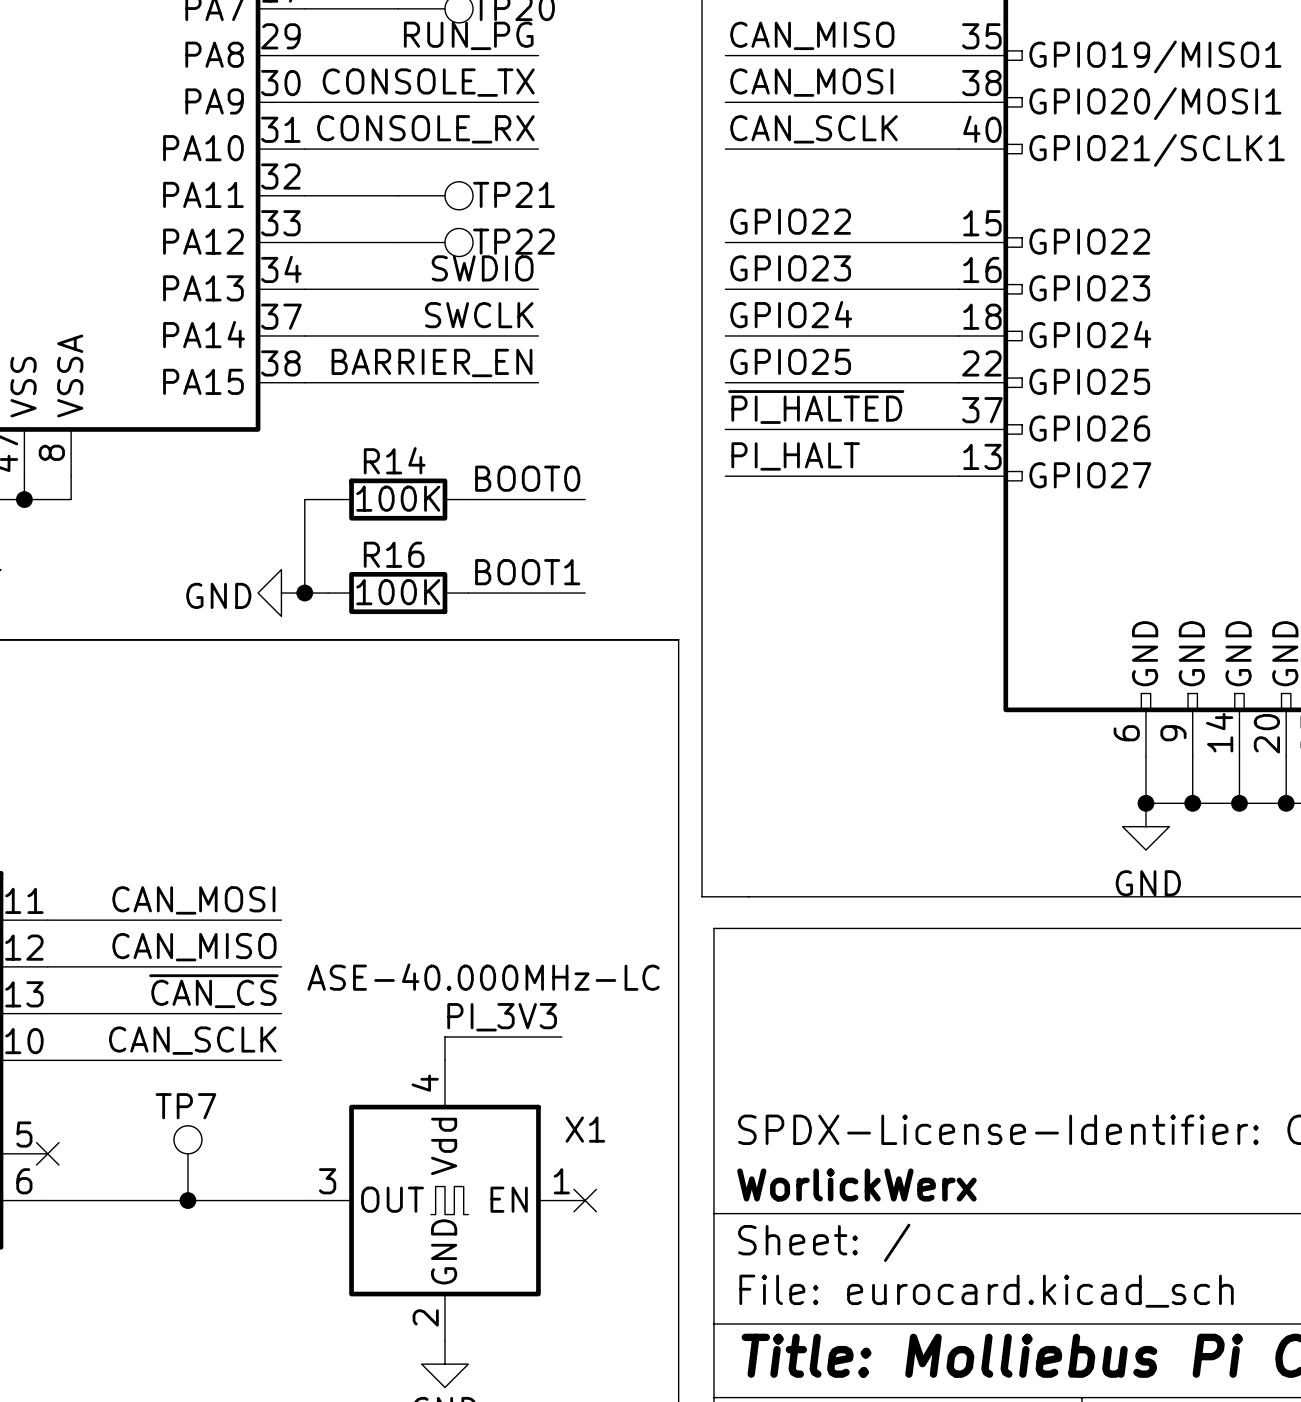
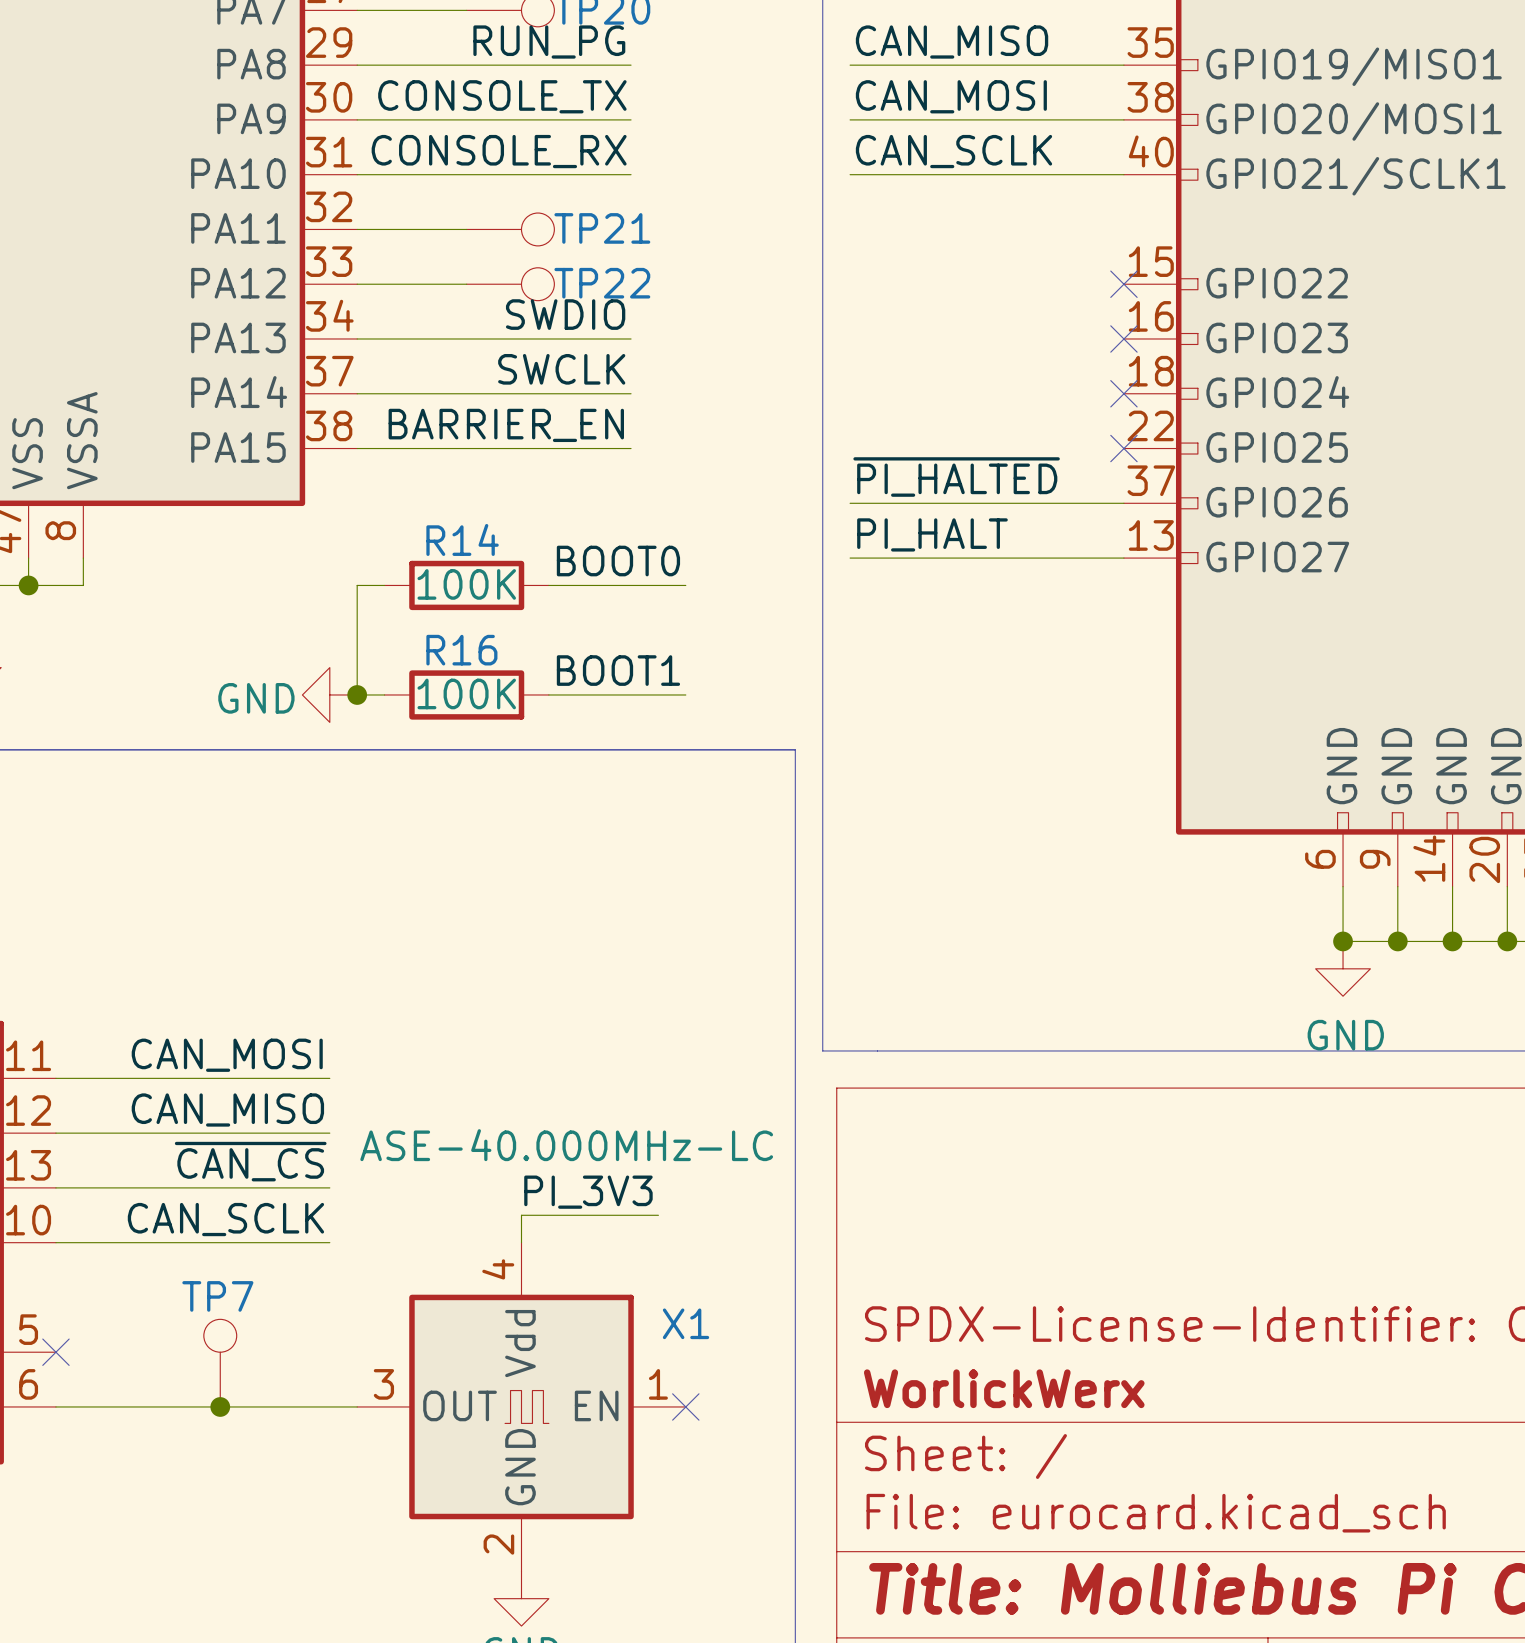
label: GPIO22 (790, 221) -> none
wire: (725, 242) (959, 242) -> none
no-connect mark: none -> (1123, 284)
label: GPIO23 (790, 268) -> none
wire: (725, 289) (959, 289) -> none
no-connect mark: none -> (1123, 338)
label: GPIO24 (791, 314) -> none
wire: (725, 335) (959, 335) -> none
no-connect mark: none -> (1123, 393)
label: GPIO25 (790, 361) -> none
wire: (725, 382) (959, 382) -> none
no-connect mark: none -> (1123, 448)

